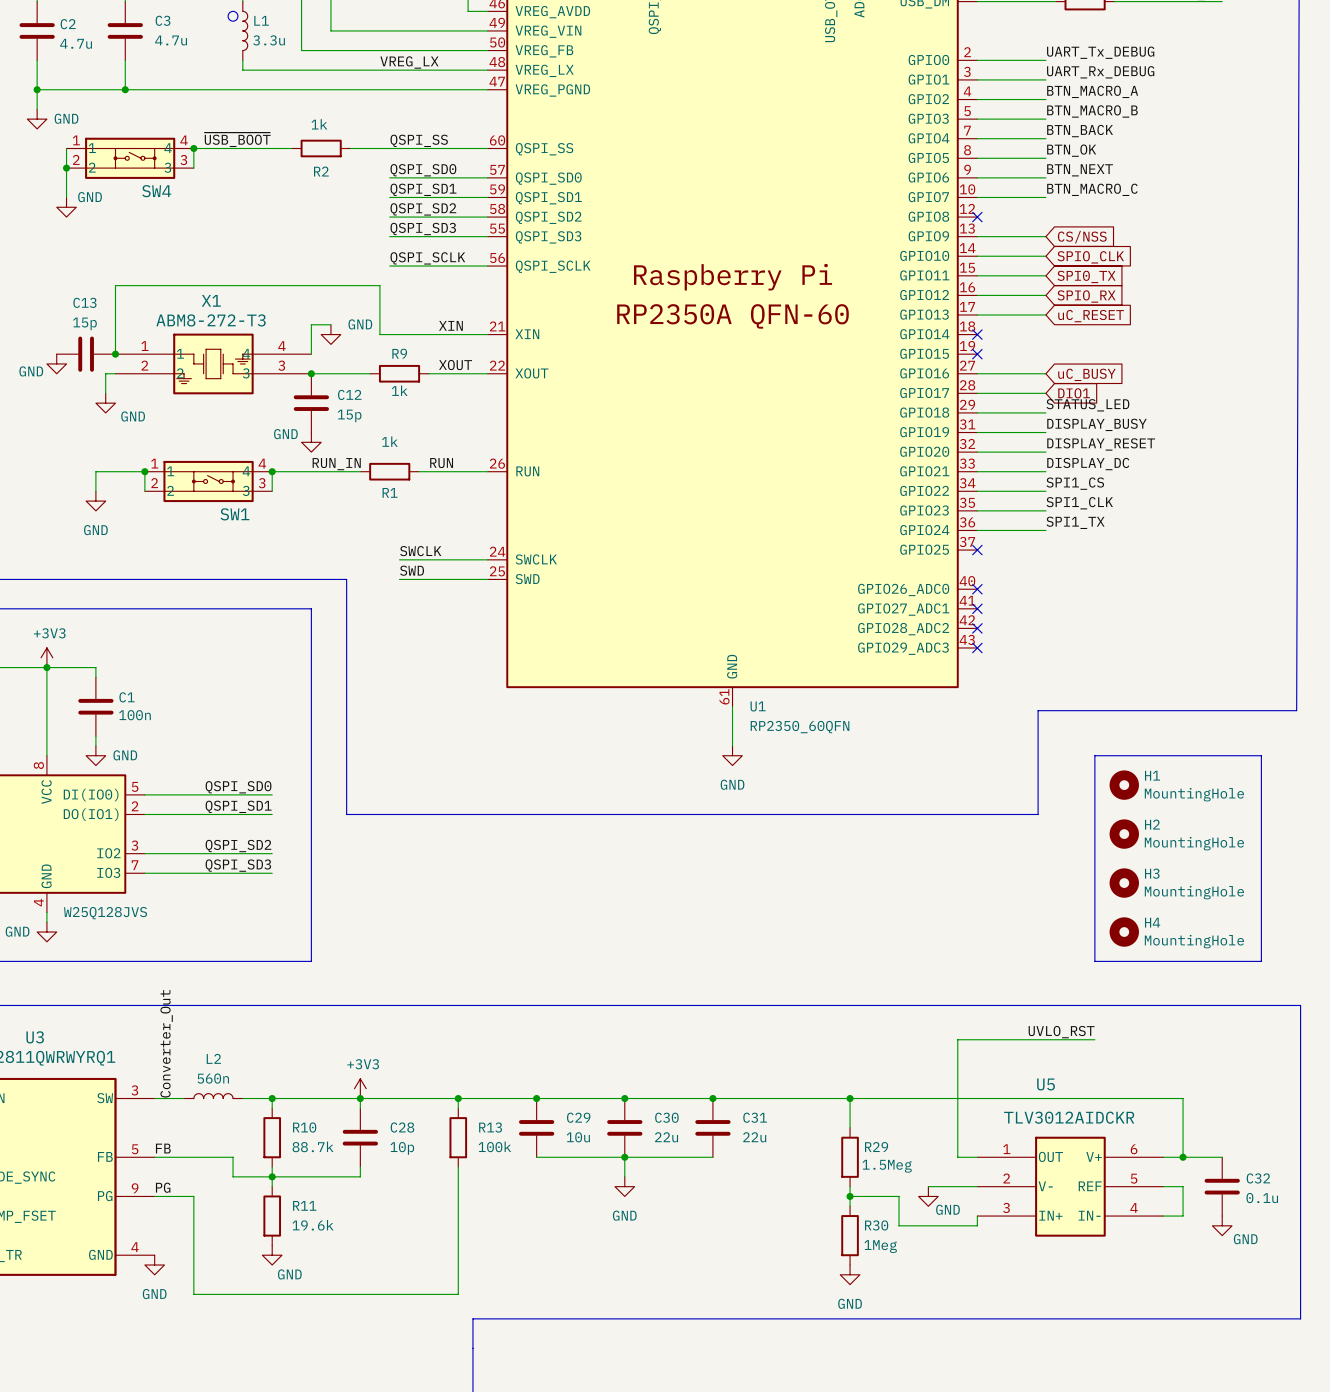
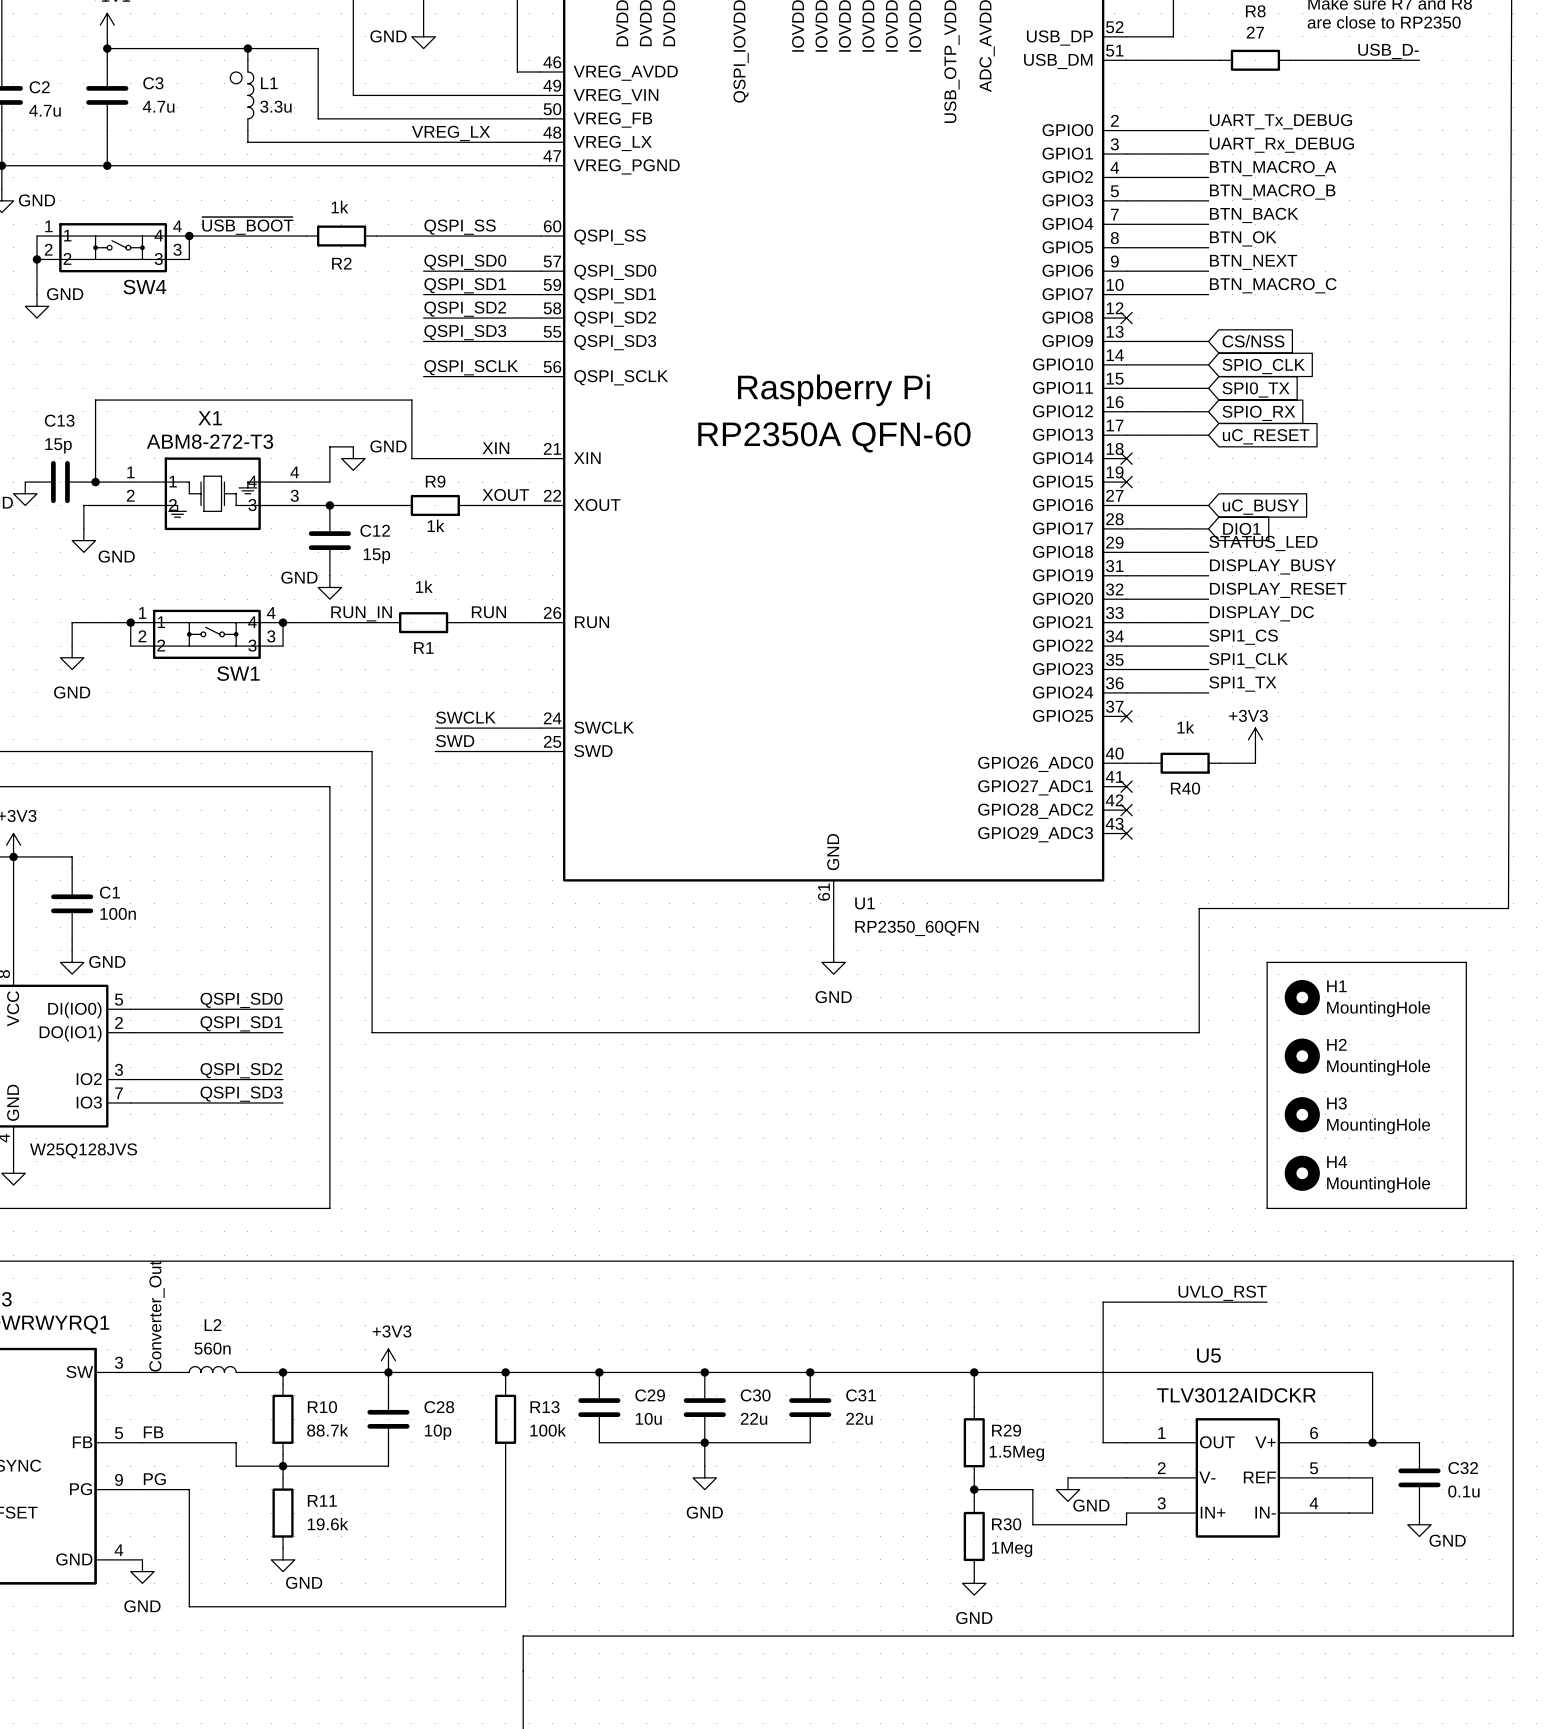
power symbol: none -> +3V3 (1255, 739)
wire: none -> (1255, 751) (1255, 763) (1220, 763)
wire: none -> (1126, 763) (1149, 763)
no-connect mark: (977, 589) -> none
R40: none -> 1k (1185, 763)

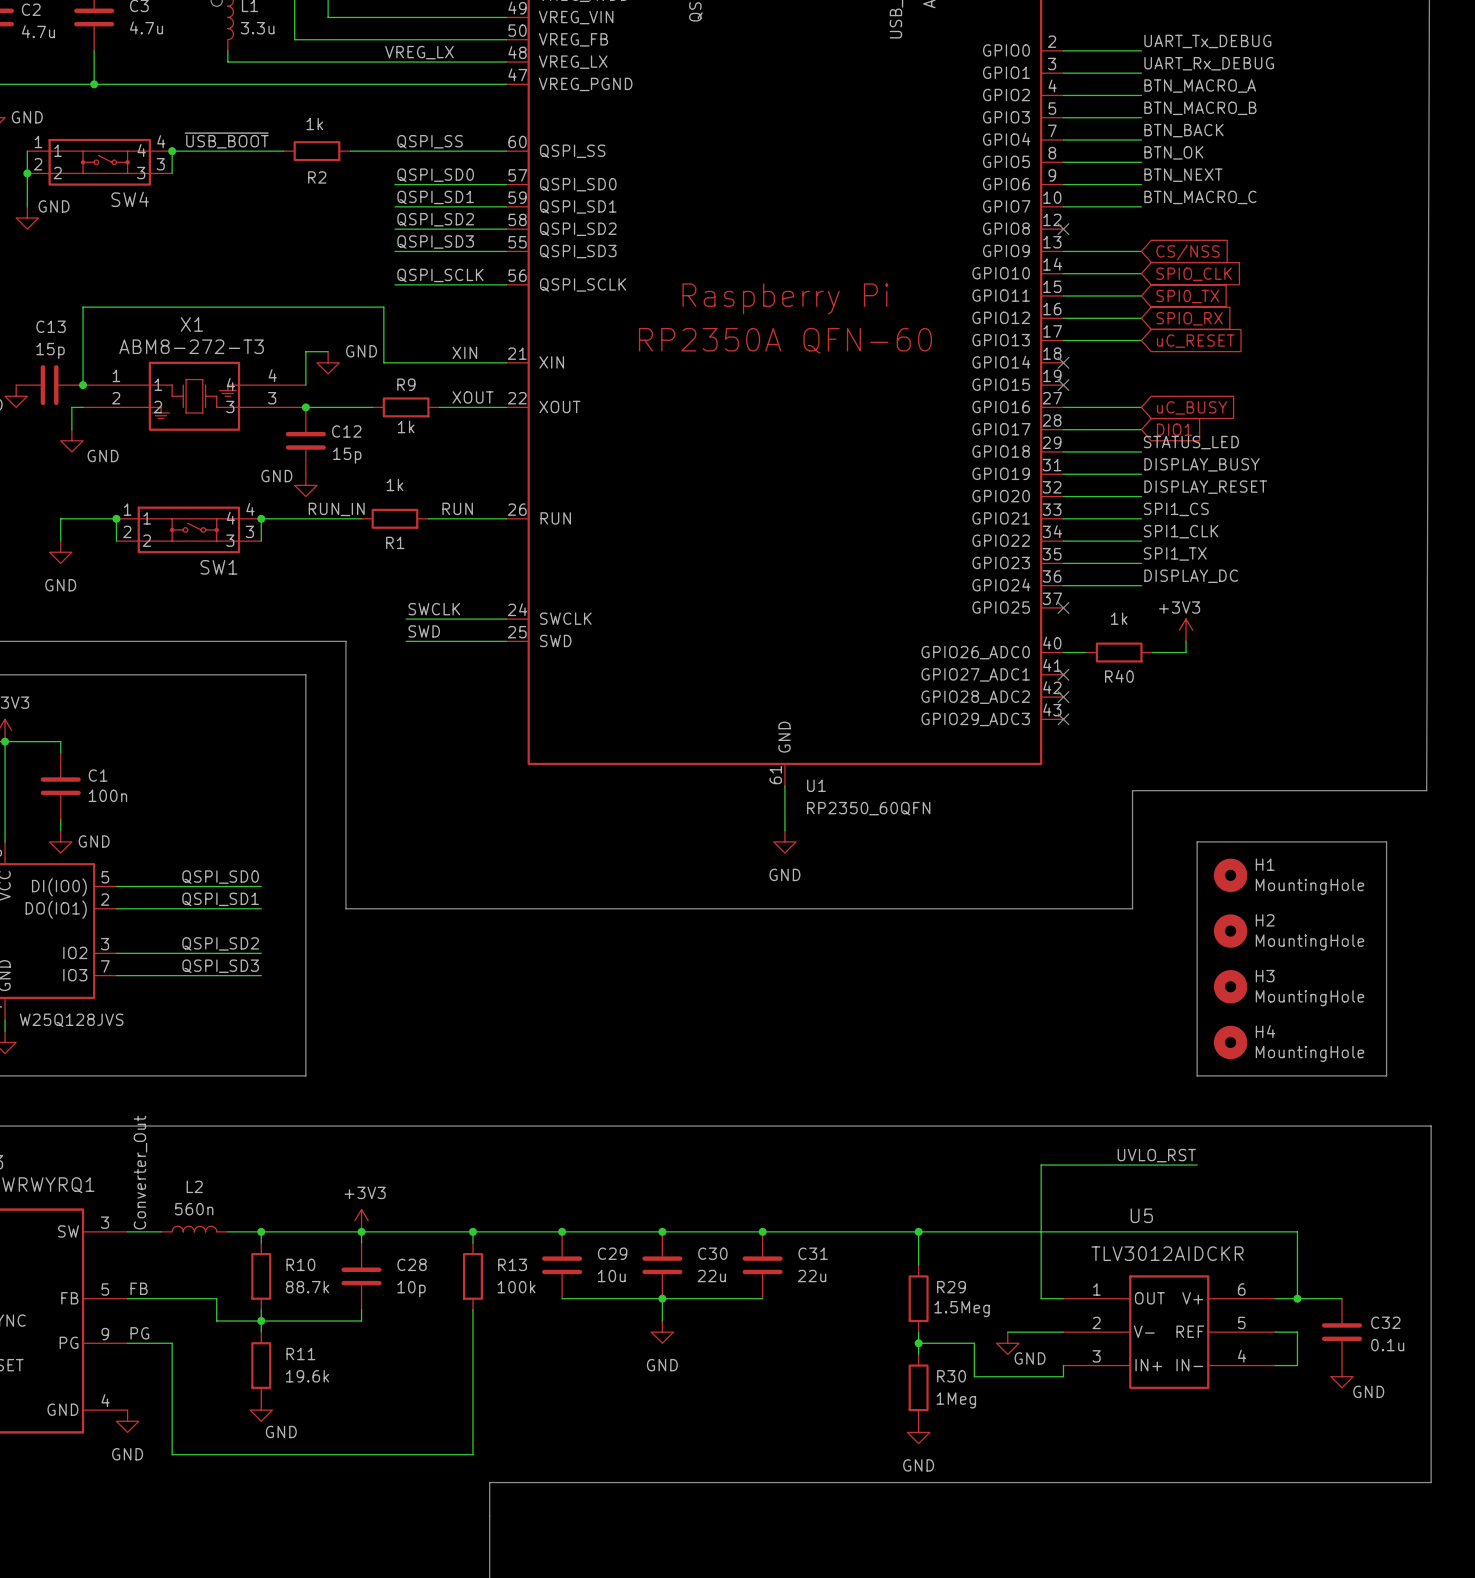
label: DISPLAY_DC (1261, 613) -> SPI1_CS (1176, 509)
label: SPI1_CS (1243, 637) -> SPI1_CLK (1181, 531)
label: SPI1_CLK (1248, 660) -> SPI1_TX (1175, 553)
label: SPI1_TX (1242, 684) -> DISPLAY_DC (1191, 576)

